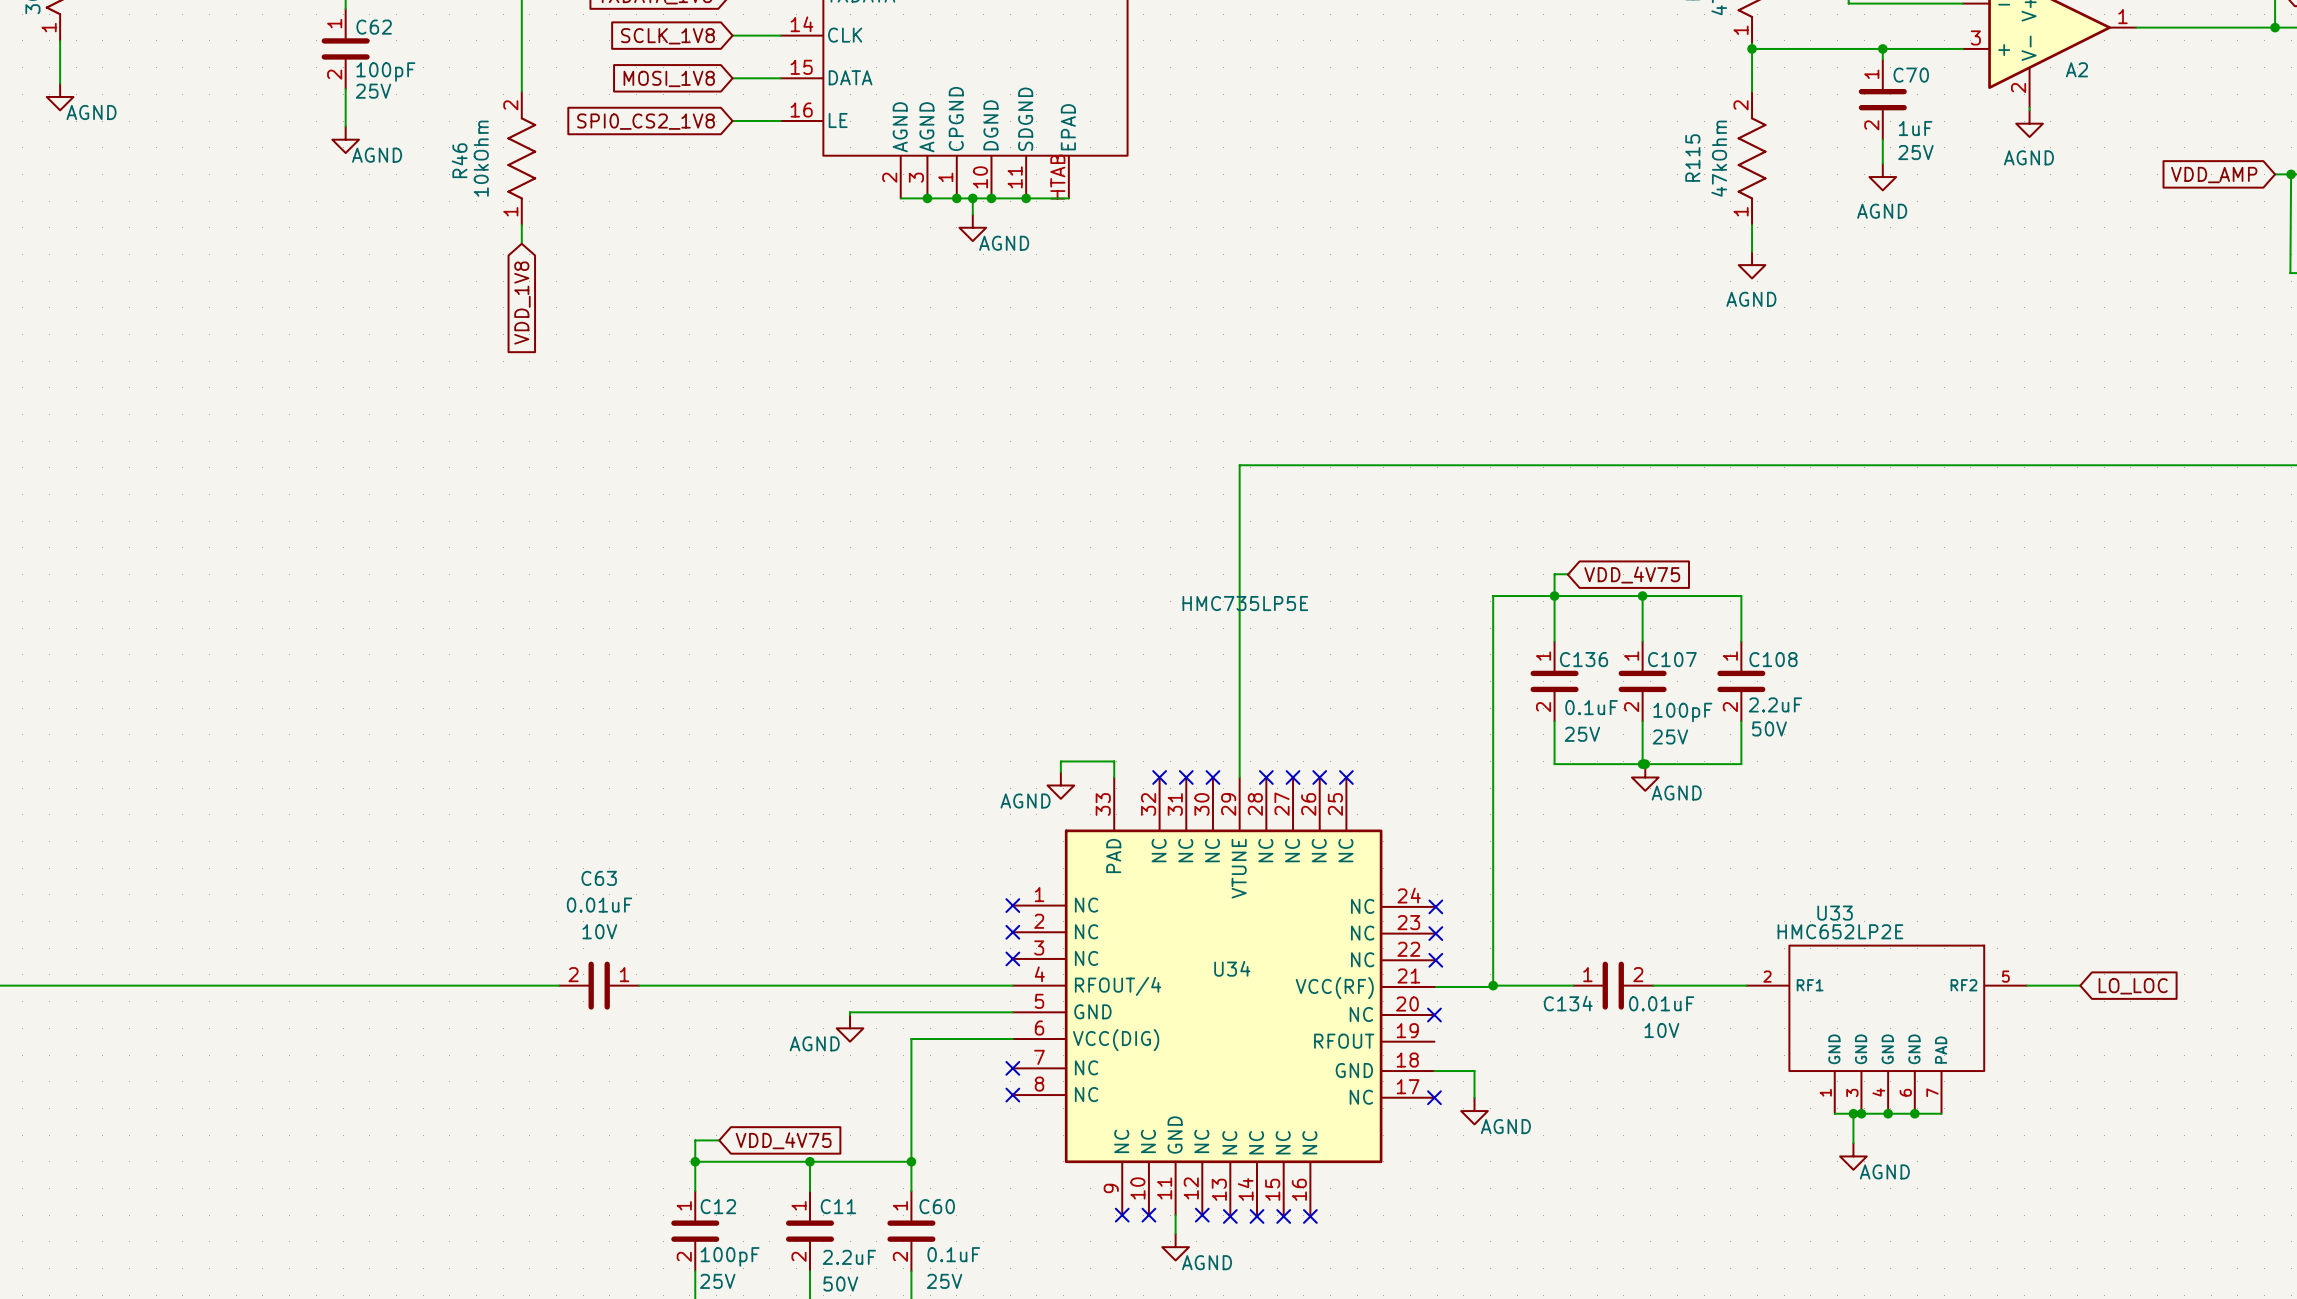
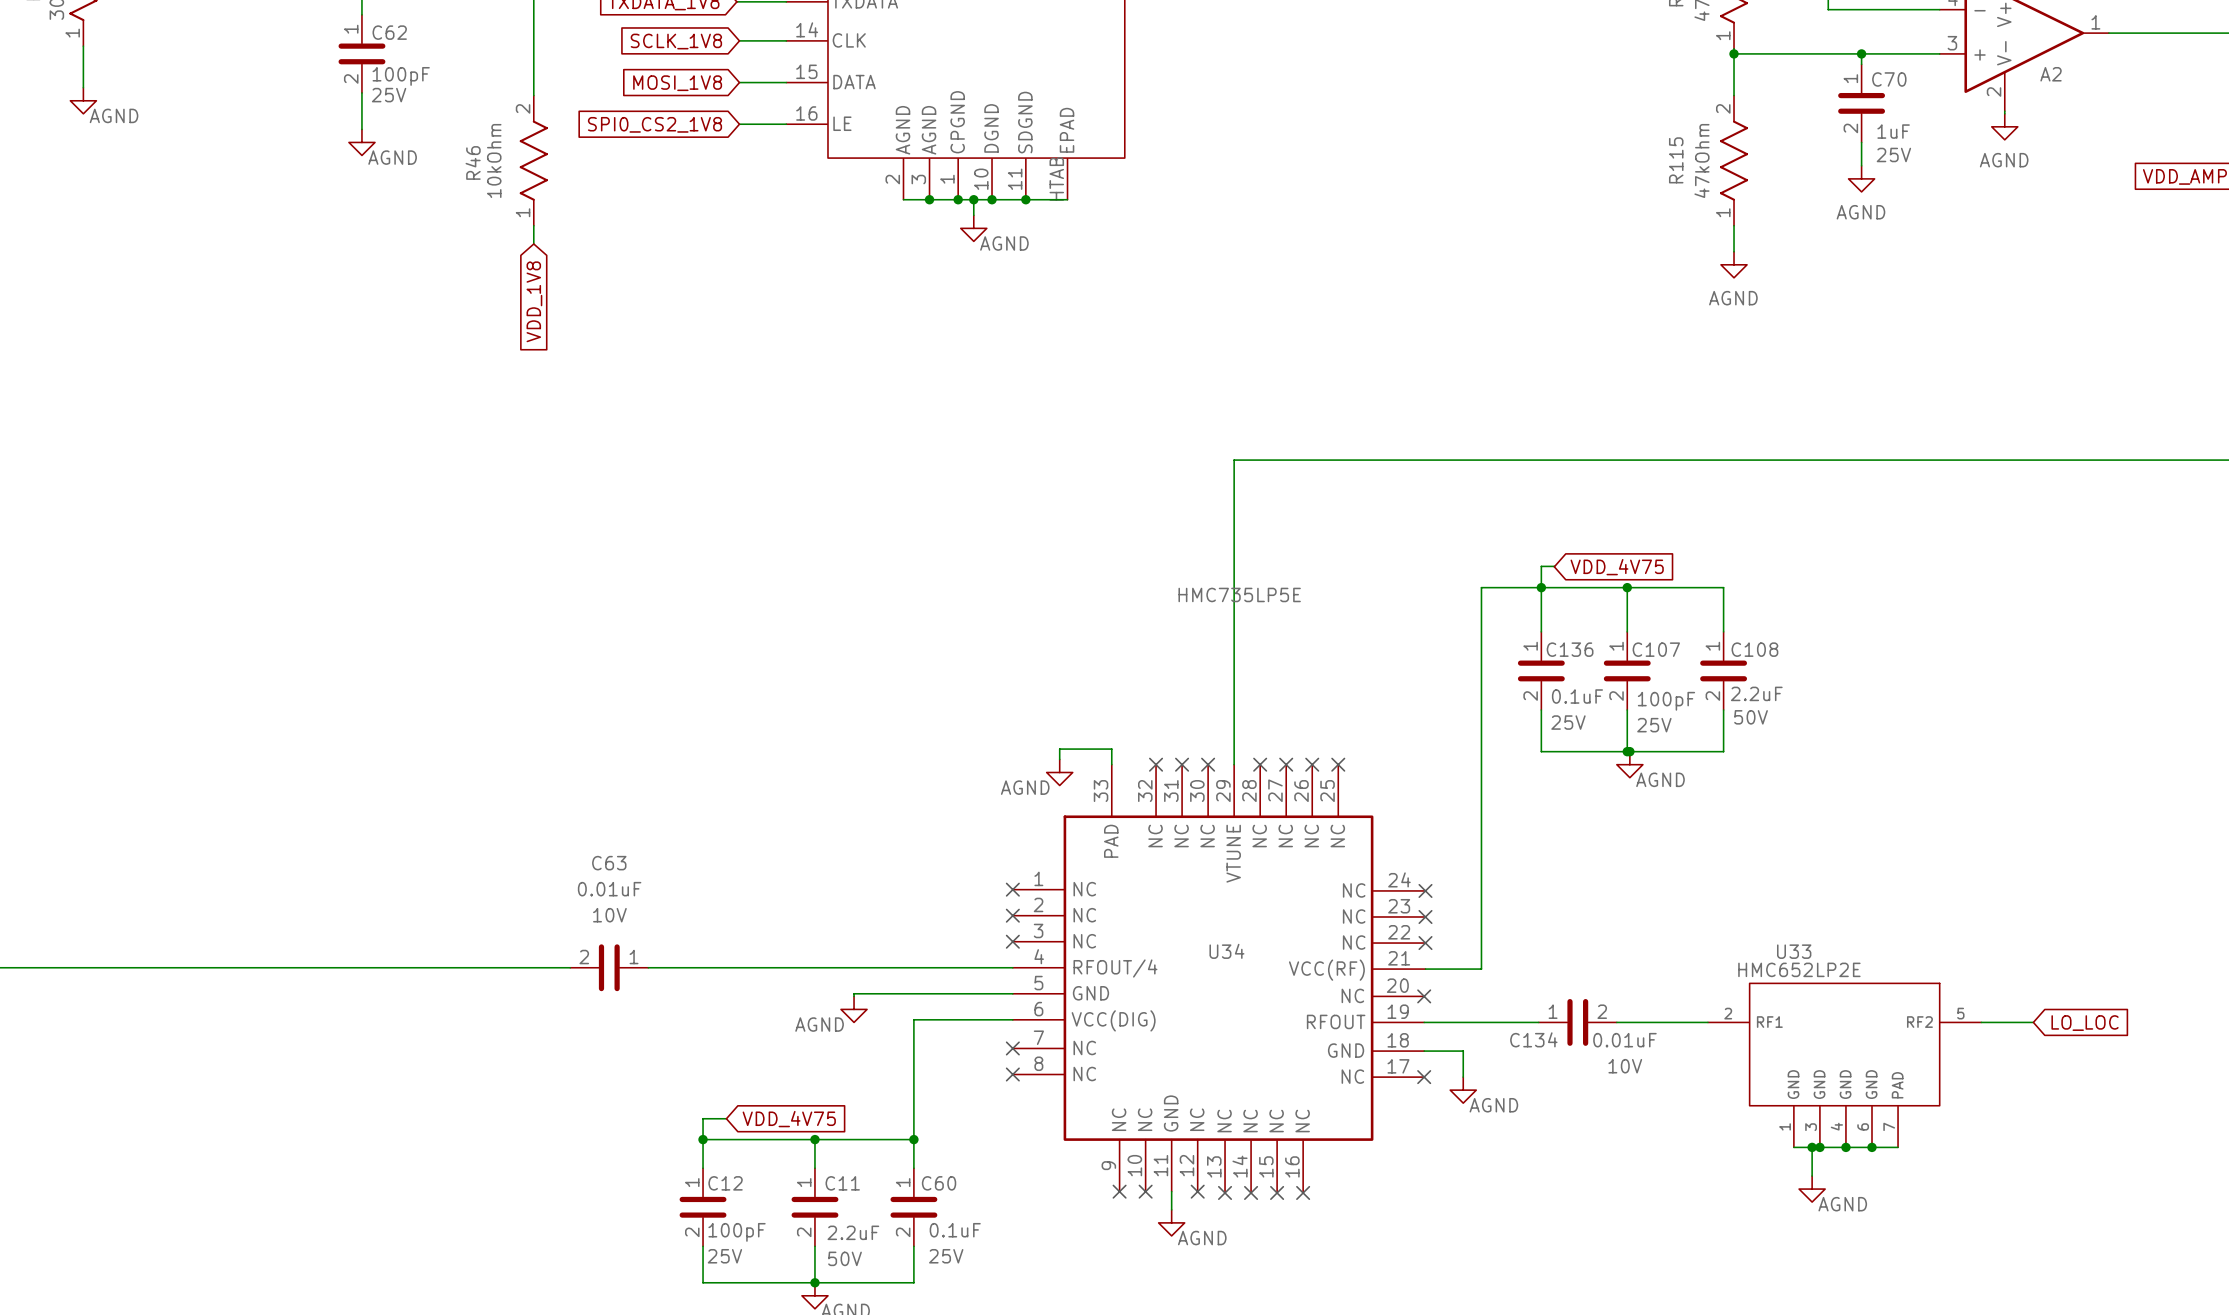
wire: (1493, 985) (1573, 985) -> none
junction: (1493, 985) -> none
C134 position: (1613, 985) -> (1577, 1022)
wire: (1653, 985) (1746, 985) -> (1616, 1022) (1707, 1022)
wire: (2026, 985) (2080, 985) -> (1981, 1022) (2033, 1022)
global label position: LO_LOC (2133, 986) -> LO_LOC (2085, 1023)
U33 position: (1886, 1029) -> (1844, 1065)
wire: none -> (1424, 1022) (1538, 1022)
wire: (1834, 1113) (1941, 1113) -> (1793, 1147) (1898, 1147)
wire: (1853, 1113) (1853, 1143) -> (1812, 1147) (1812, 1176)
junction: (1853, 1113) -> none
junction: (1861, 1113) -> none
junction: (1888, 1113) -> none
junction: (1914, 1113) -> none
power symbol position: AGND (1853, 1156) -> AGND (1812, 1189)
junction: none -> (1812, 1147)
junction: none -> (1819, 1147)
junction: none -> (1845, 1147)
junction: none -> (1871, 1147)

